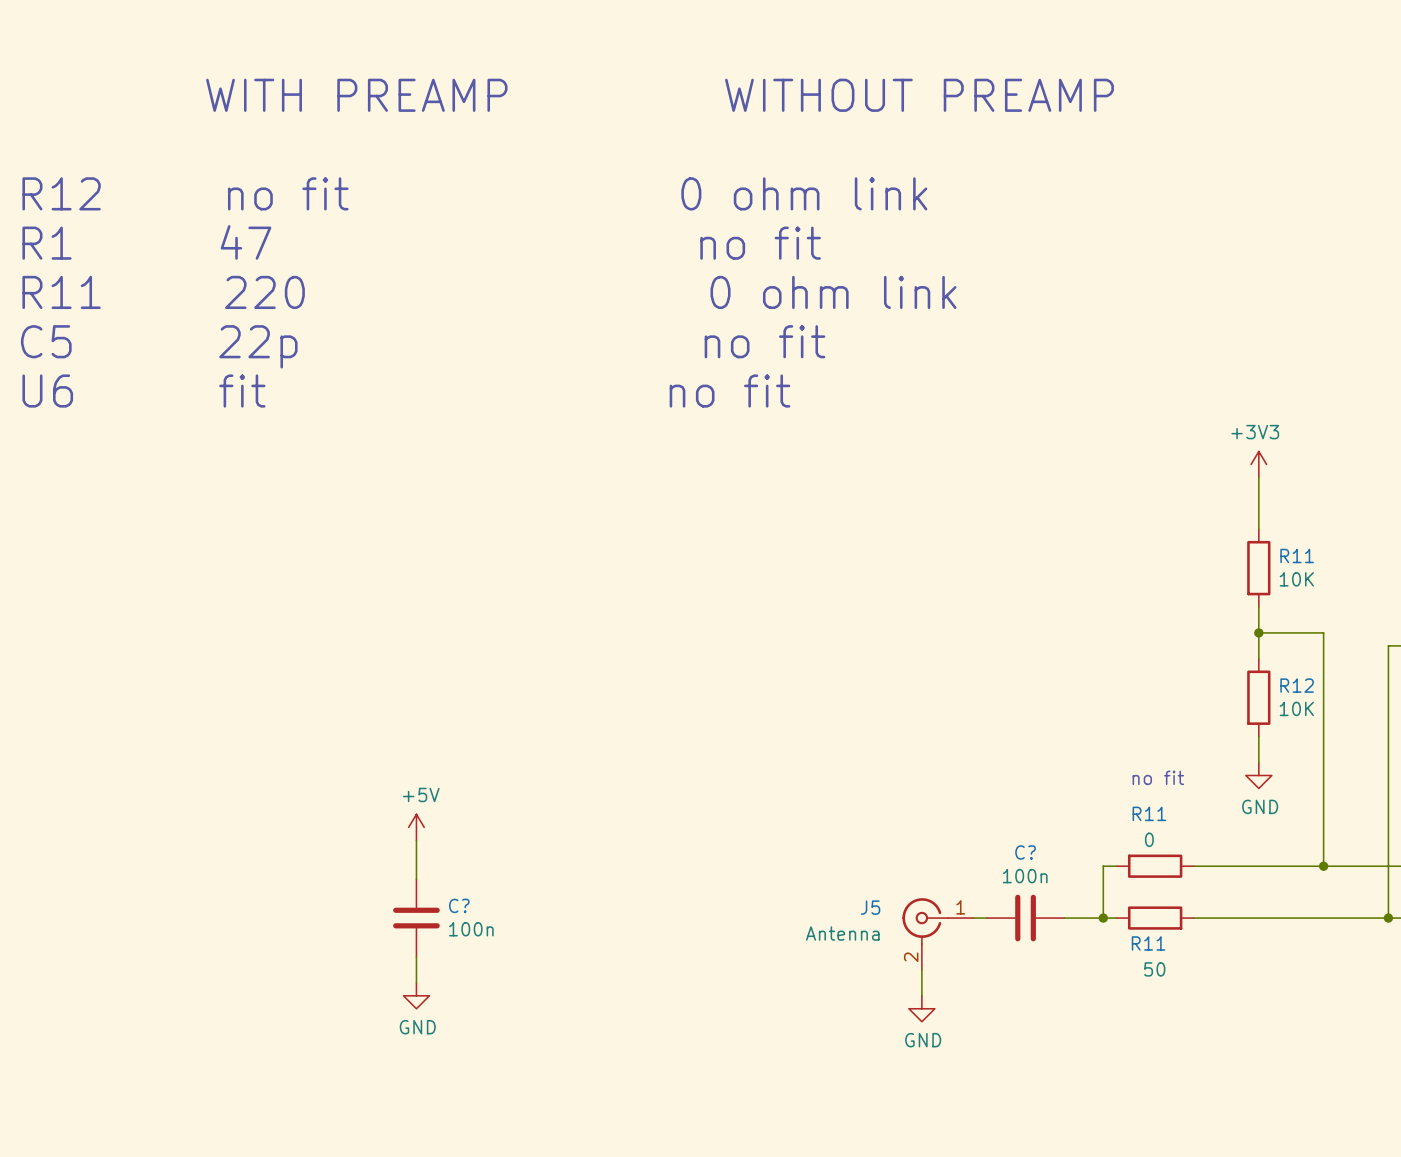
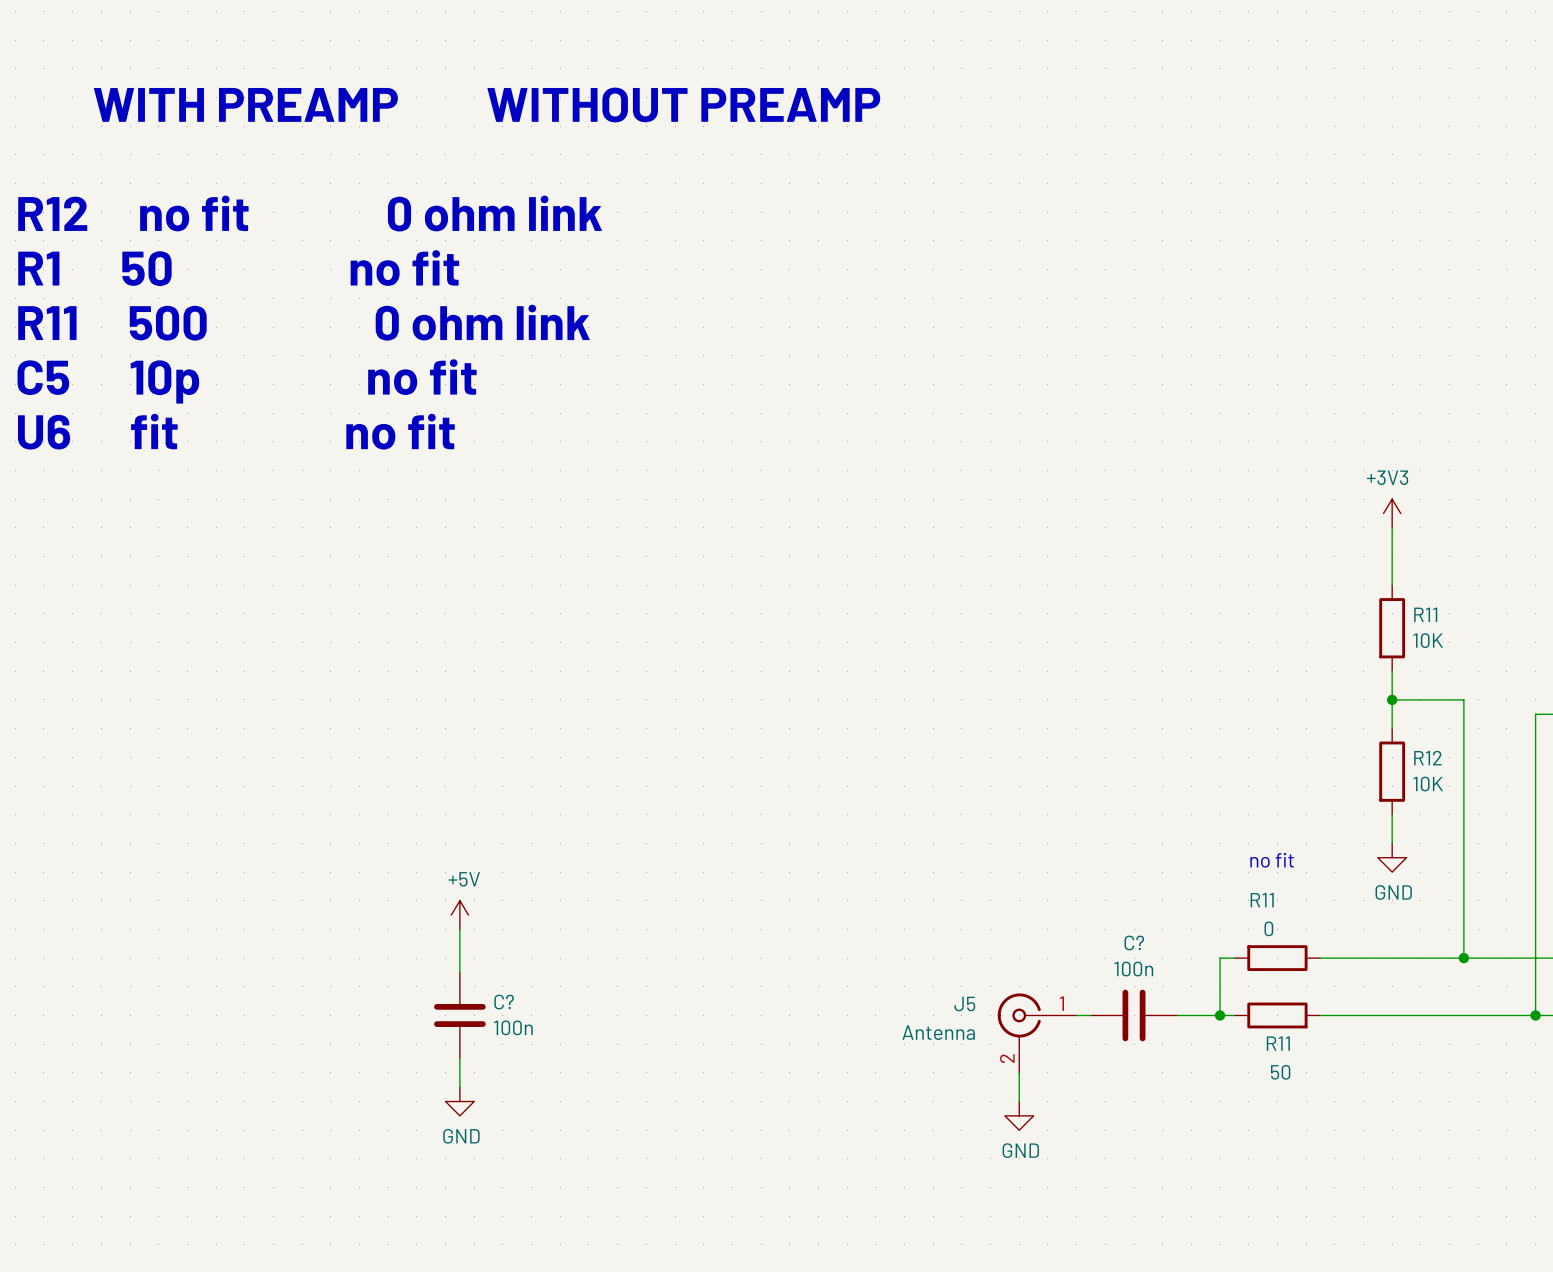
text: R1 47 no fit (421, 242) -> R1 50 no fit (238, 268)
text: R11 220 0 ohm link (489, 292) -> R11 500 0 ohm link (303, 322)
text: C5 22p no fit (423, 346) -> C5 10p no fit (247, 381)

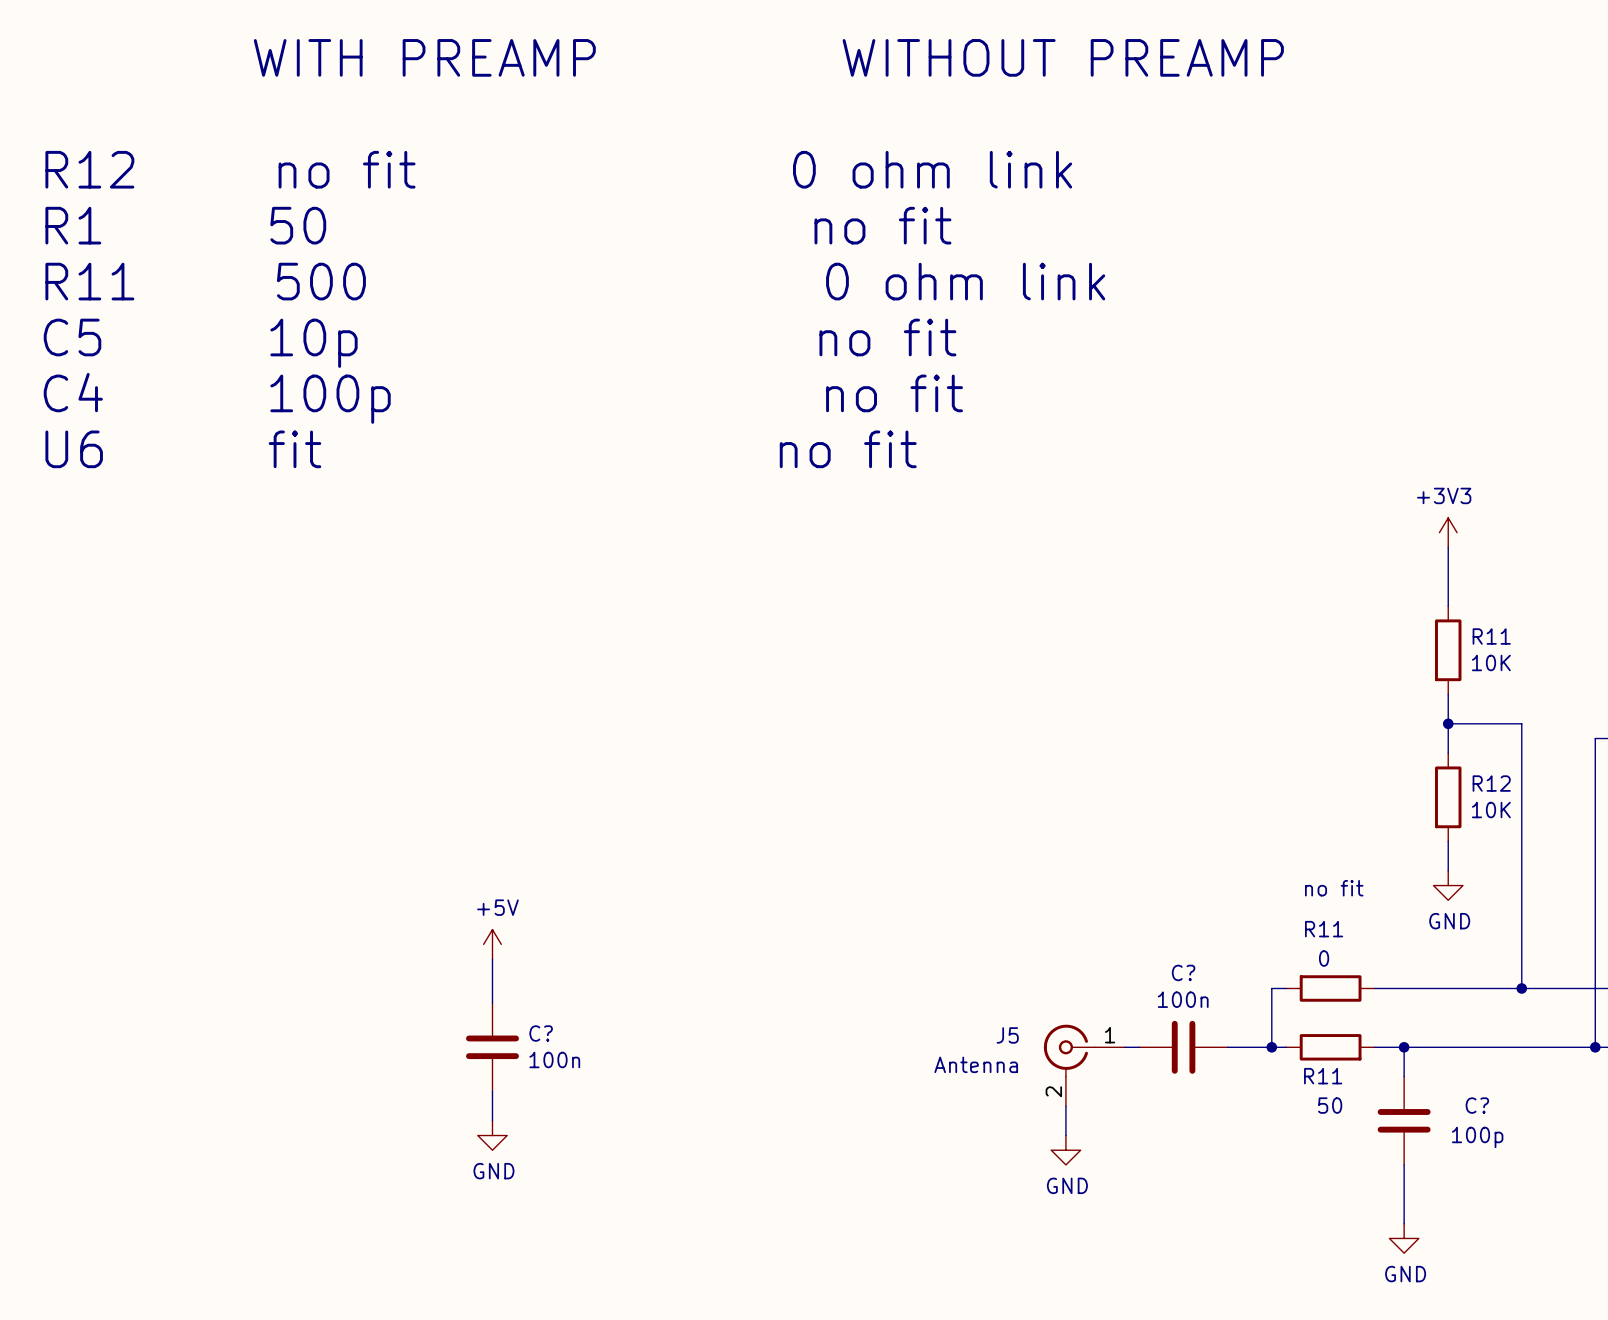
text position: WITH PREAMP WITHOUT PREAMP (487, 105) -> WITH PREAMP WITHOUT PREAMP (768, 57)
text: none -> R12 no fit 0 ohm link (558, 169)
text: R12 no fit 0 ohm link (310, 213) -> R1 50 no fit (498, 225)
text: R1 50 no fit (238, 268) -> R11 500 0 ohm link (575, 281)
text: R11 500 0 ohm link (303, 322) -> C5 10p no fit (500, 343)
text: C5 10p no fit (247, 381) -> C4 100p no fit (503, 398)
wire: none -> (1404, 1047) (1404, 1076)
junction: none -> (1404, 1047)
C?: none -> 100p (1404, 1120)
wire: none -> (1404, 1164) (1404, 1223)
power symbol: none -> GND (1404, 1238)

